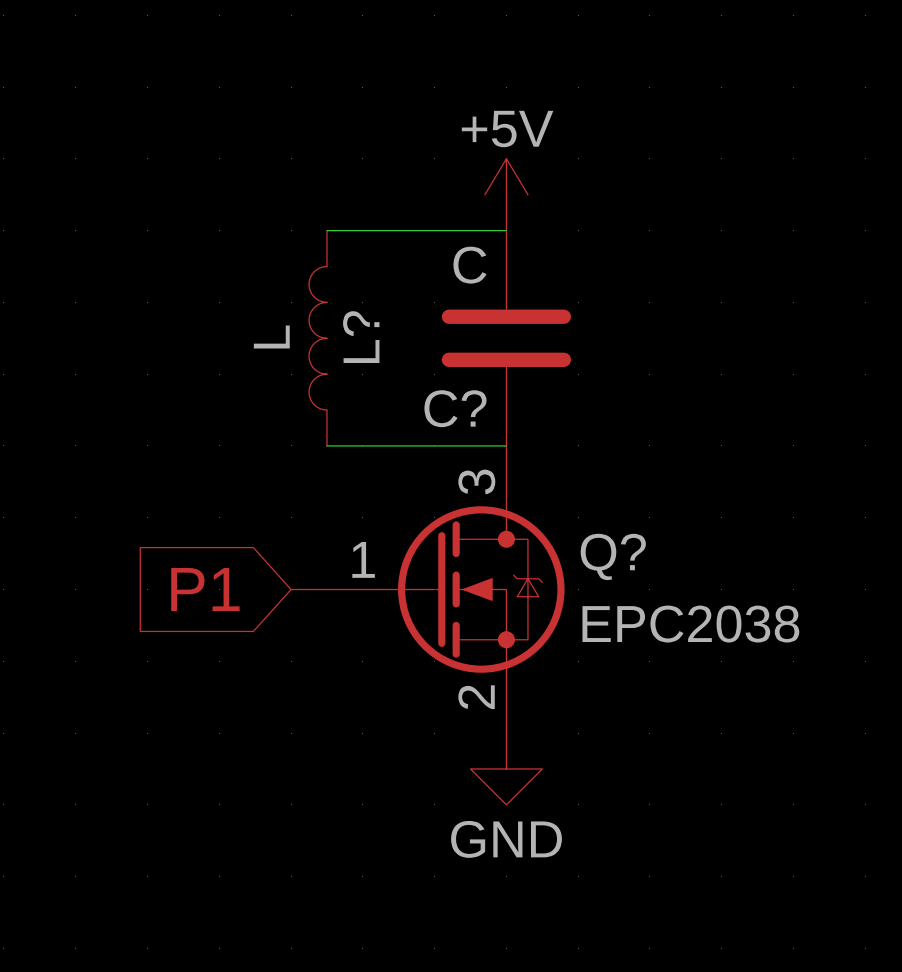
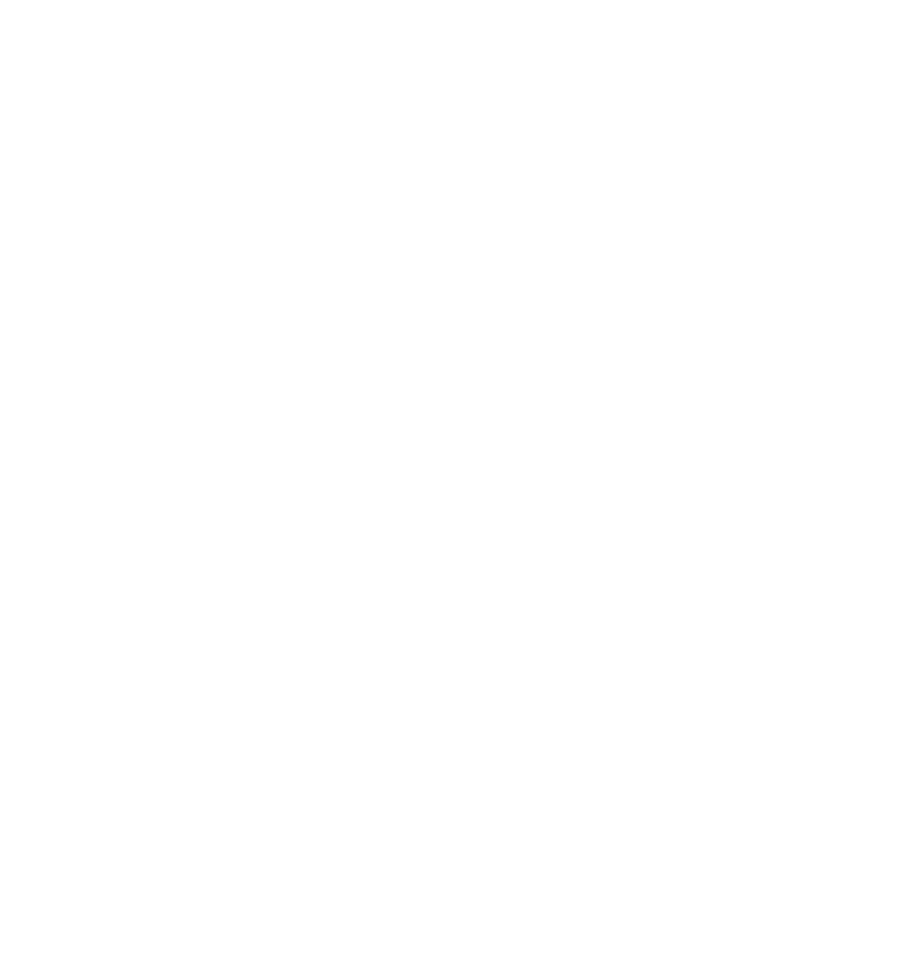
power symbol: +5V (506, 194) -> none
wire: (326, 230) (506, 230) -> none
L?: L (318, 338) -> none
C?: C (506, 338) -> none
wire: (326, 445) (506, 445) -> none
global label: P1 (205, 589) -> none
Q?: EPC2038 (427, 589) -> none
power symbol: GND (506, 768) -> none

